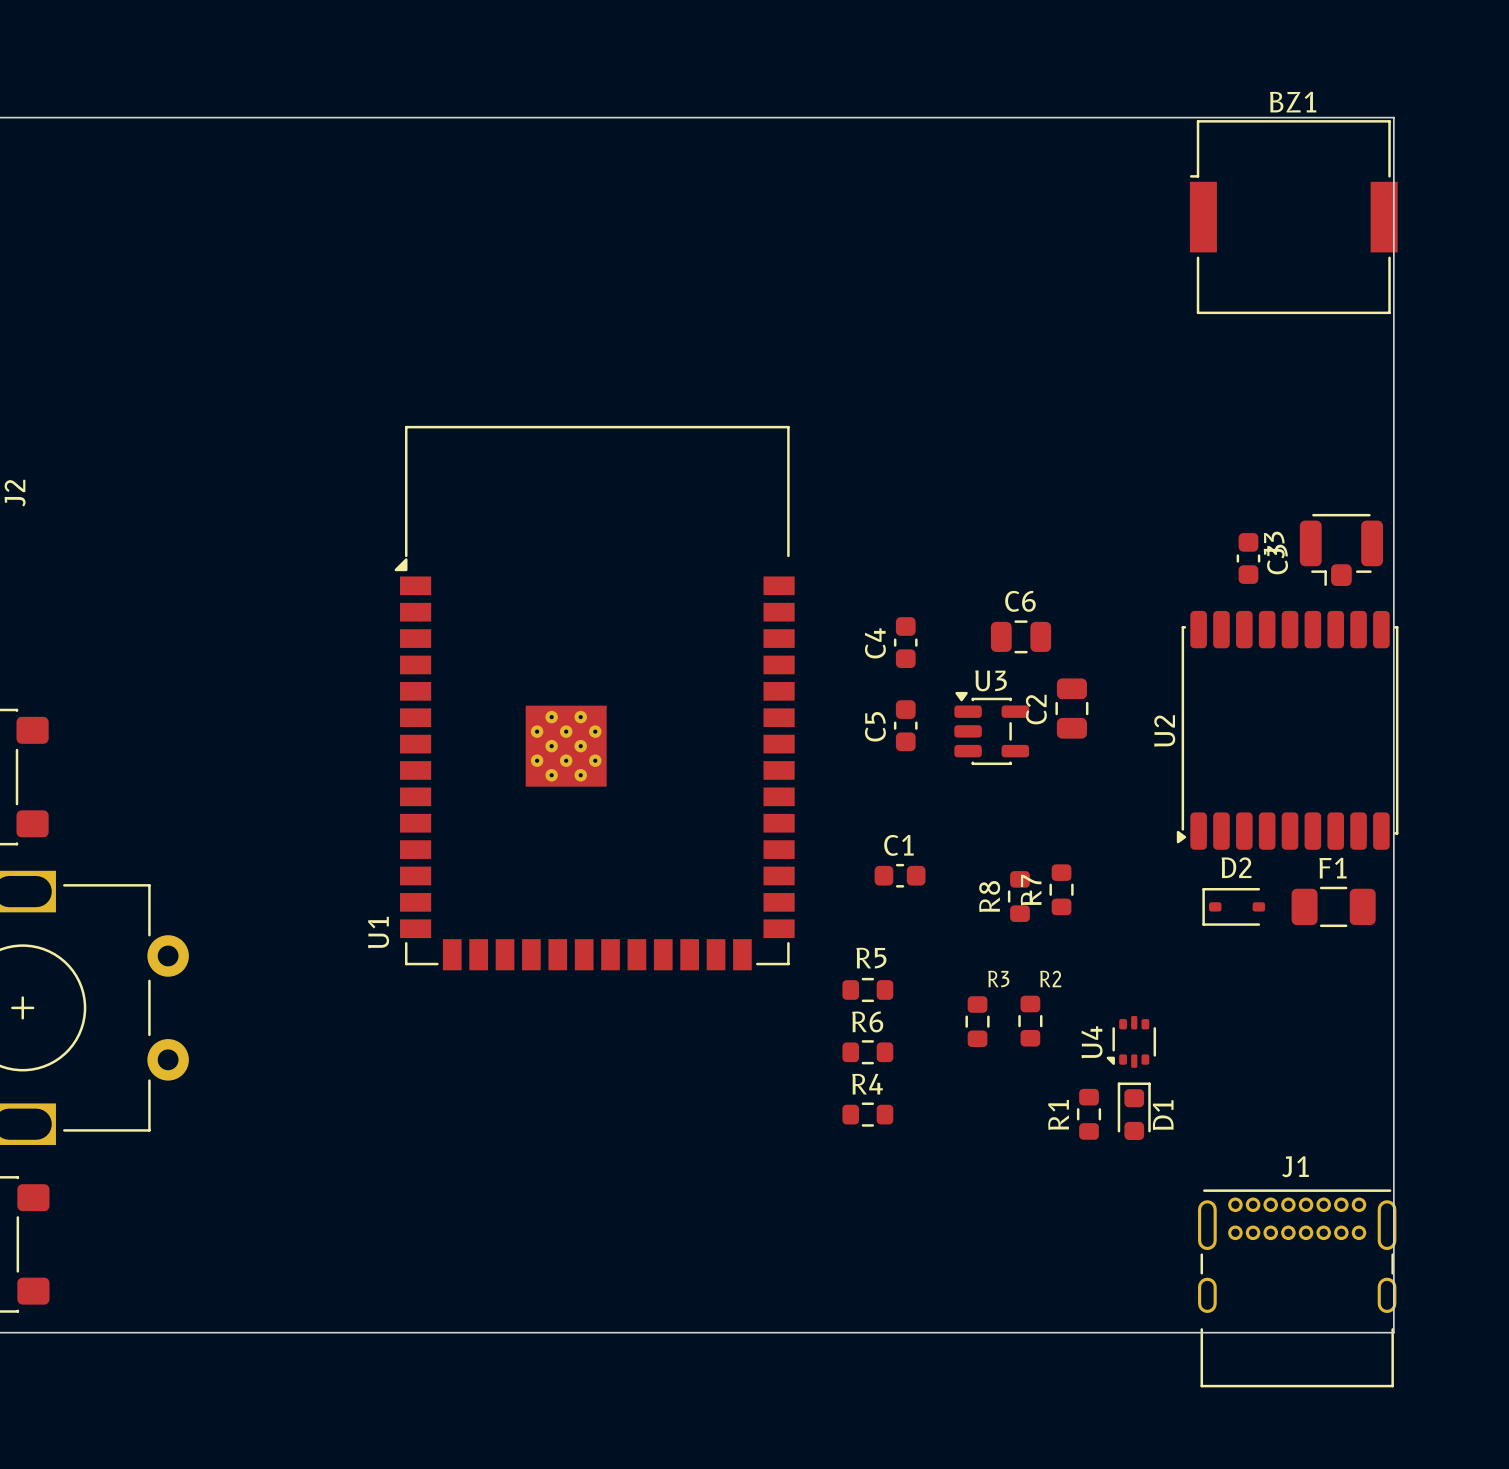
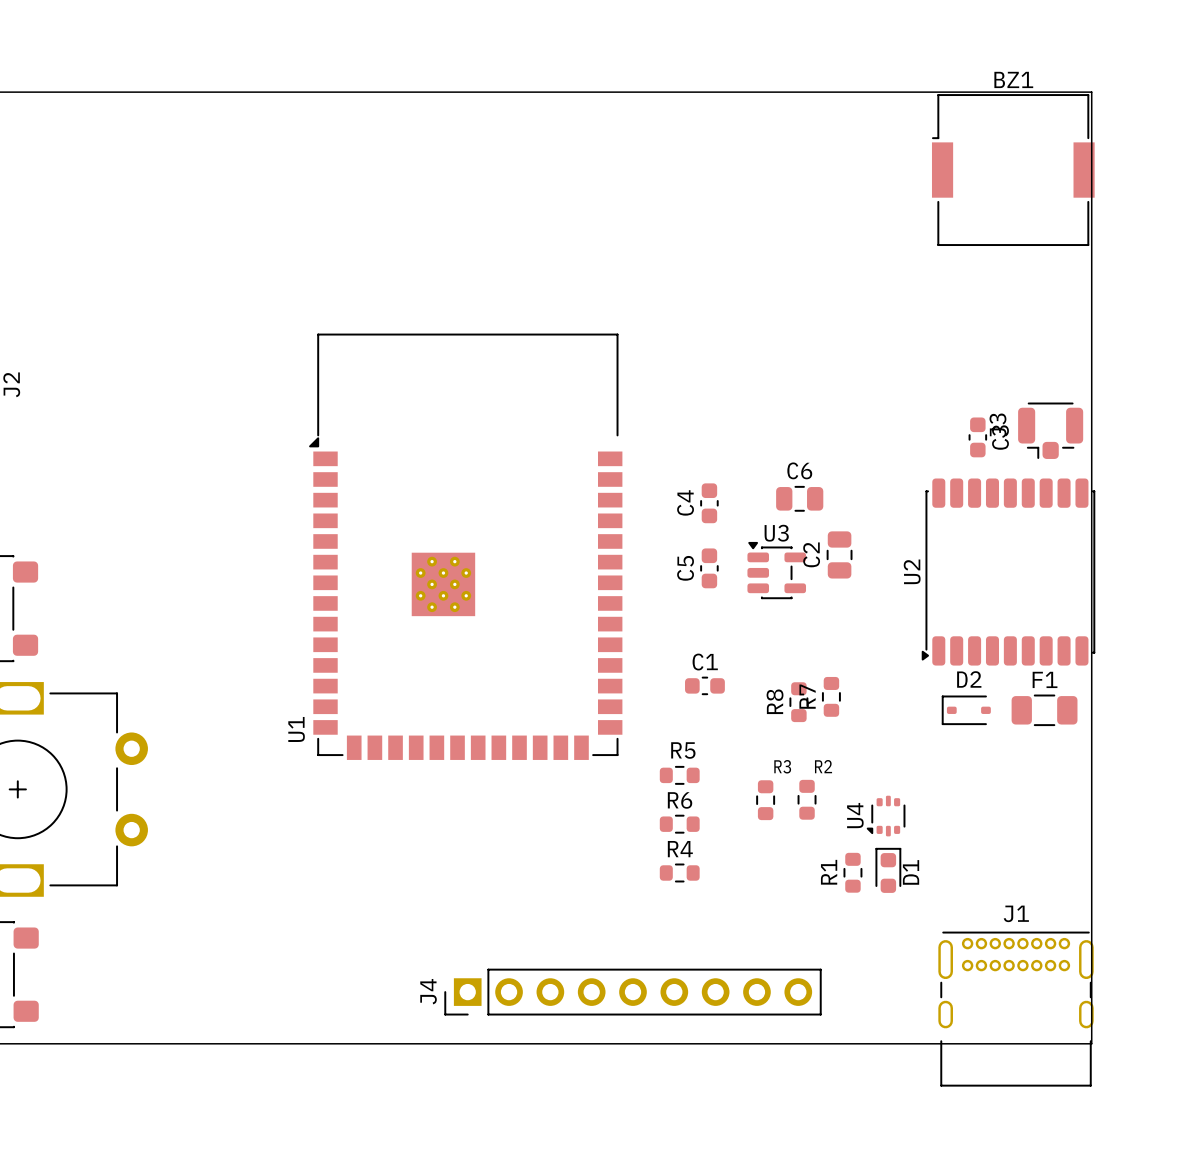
J4: none -> (633, 992)

